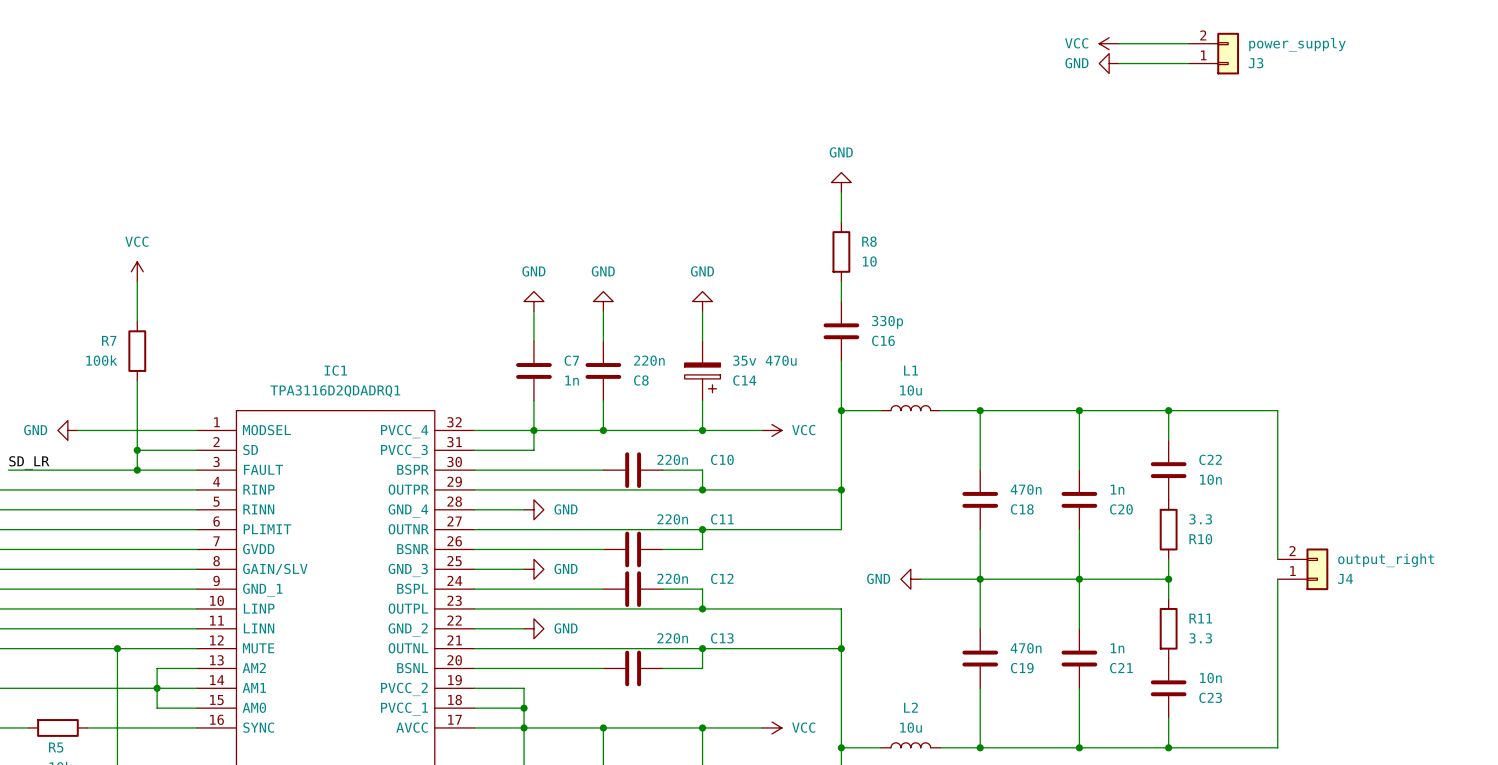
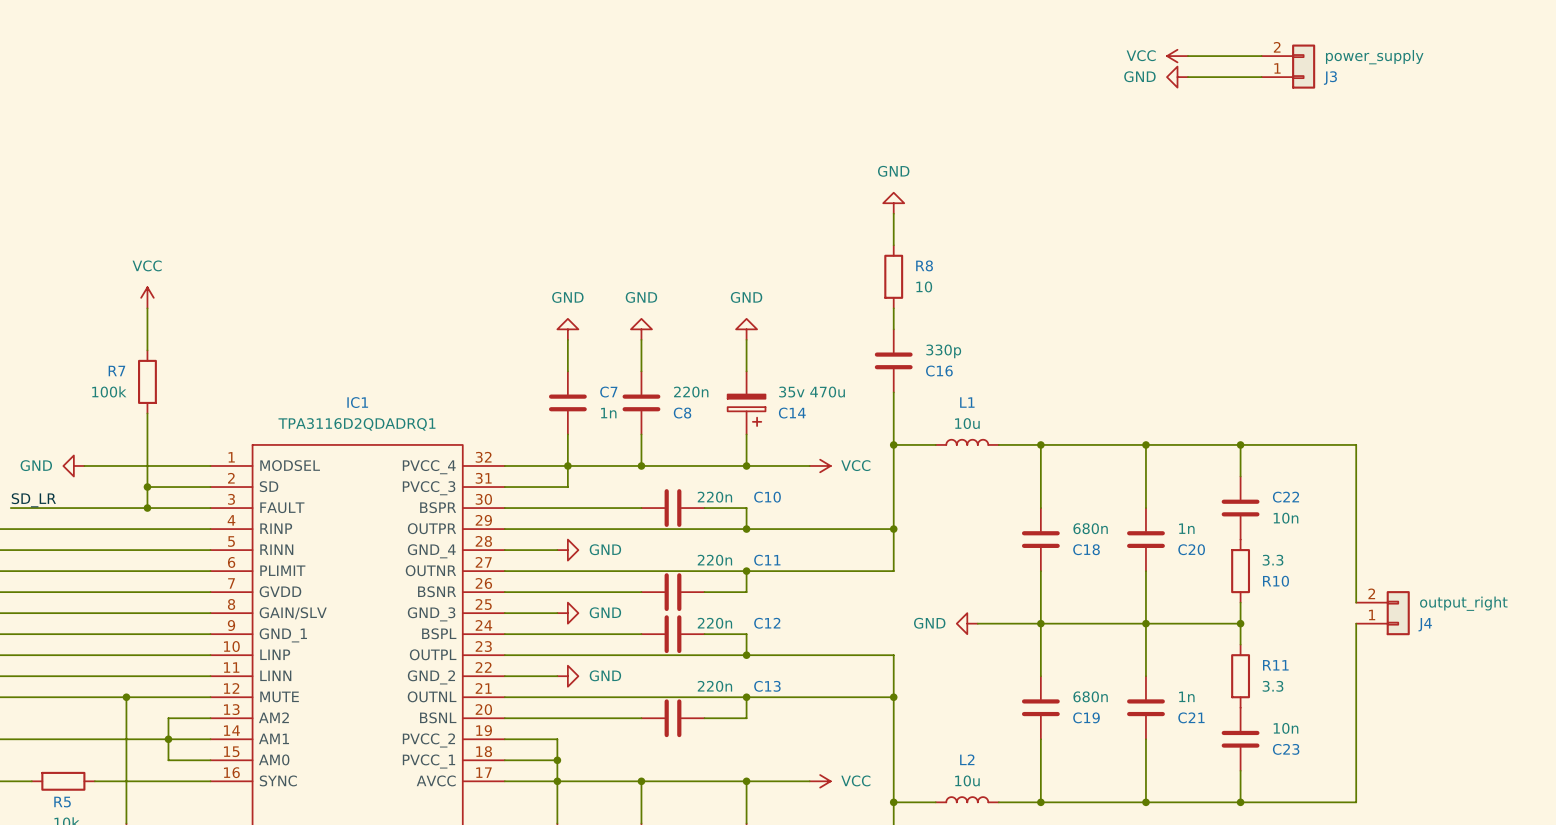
C18 value: 470n (1026, 489) -> 680n (1090, 528)
C19 value: 470n (1026, 648) -> 680n (1090, 696)

